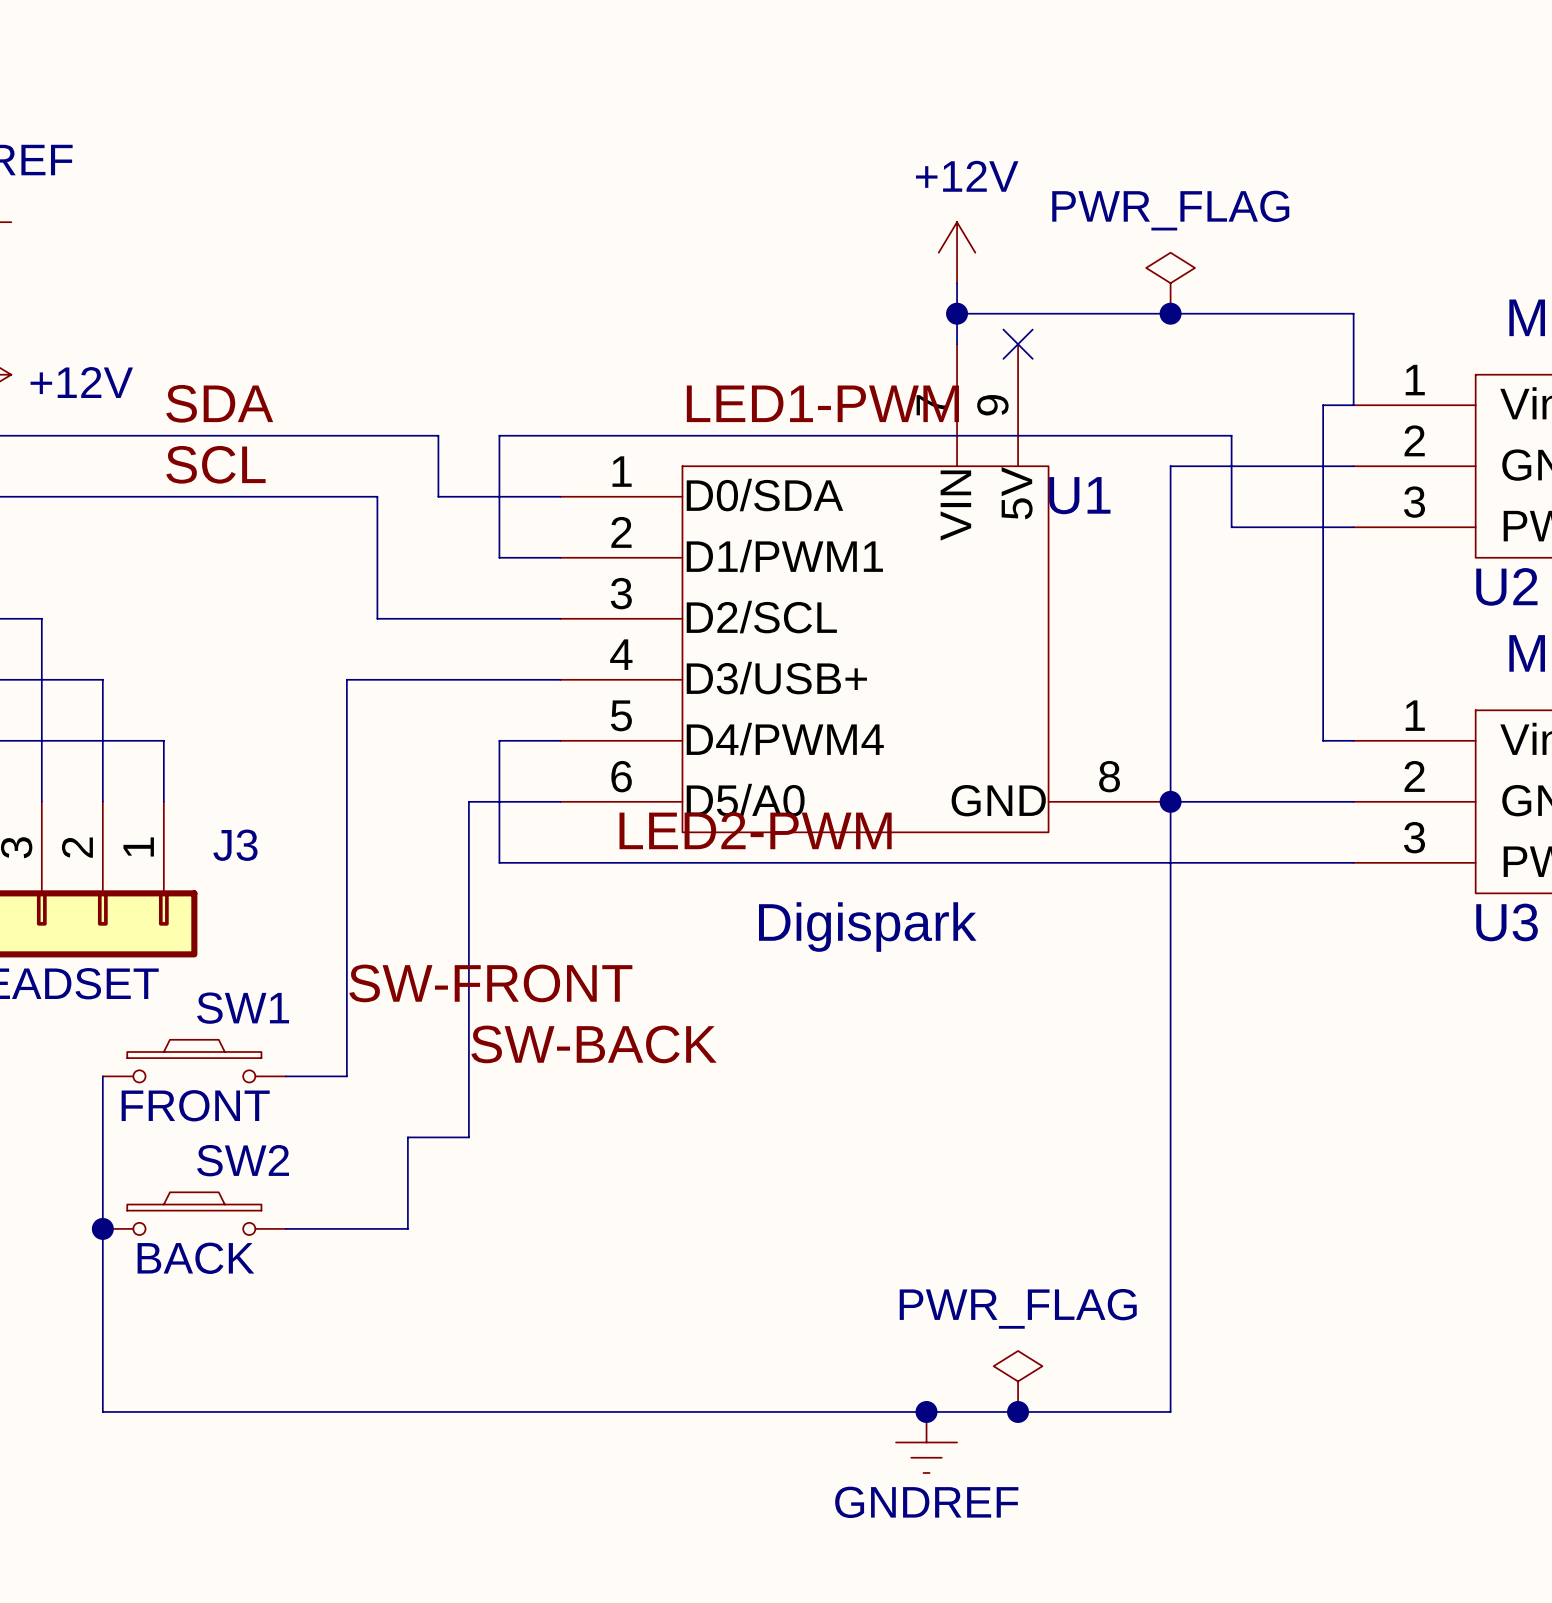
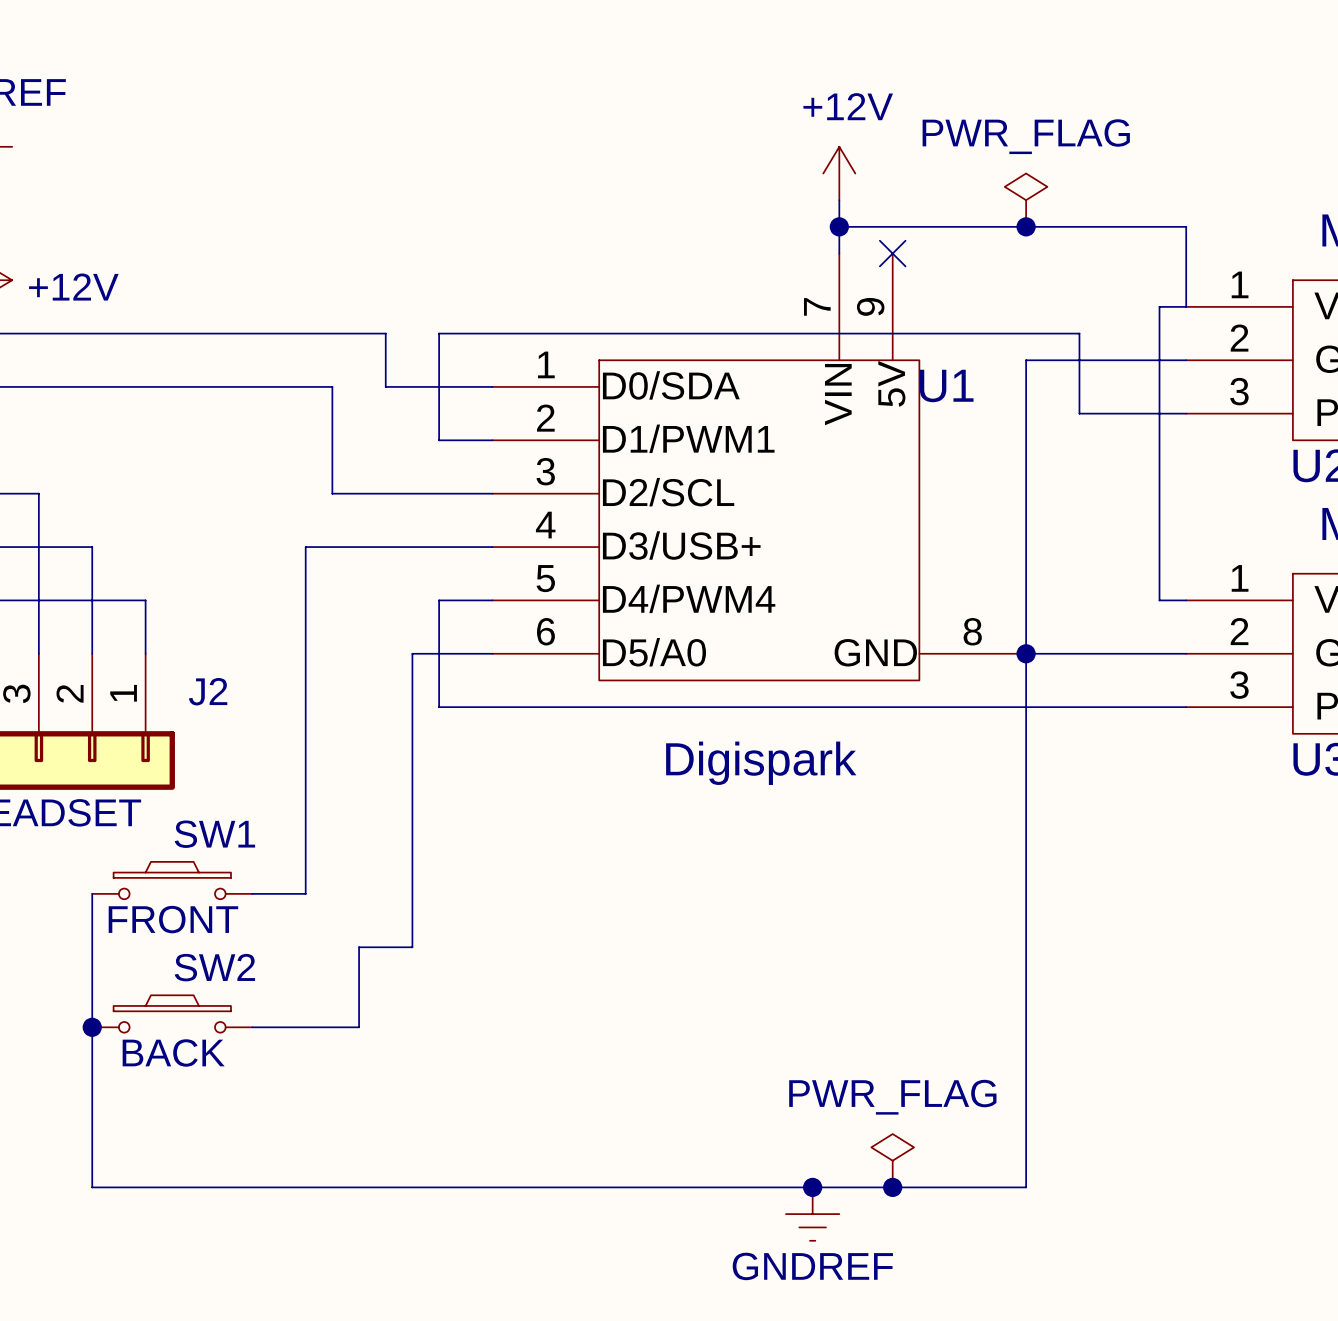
label: SDA (219, 403) -> none
label: LED1-PWM (822, 403) -> none
label: SCL (215, 464) -> none
label: LED2-PWM (755, 830) -> none
J3 name: J3 (235, 845) -> J2 (208, 691)
label: SW-FRONT (490, 983) -> none
label: SW-BACK (594, 1044) -> none

